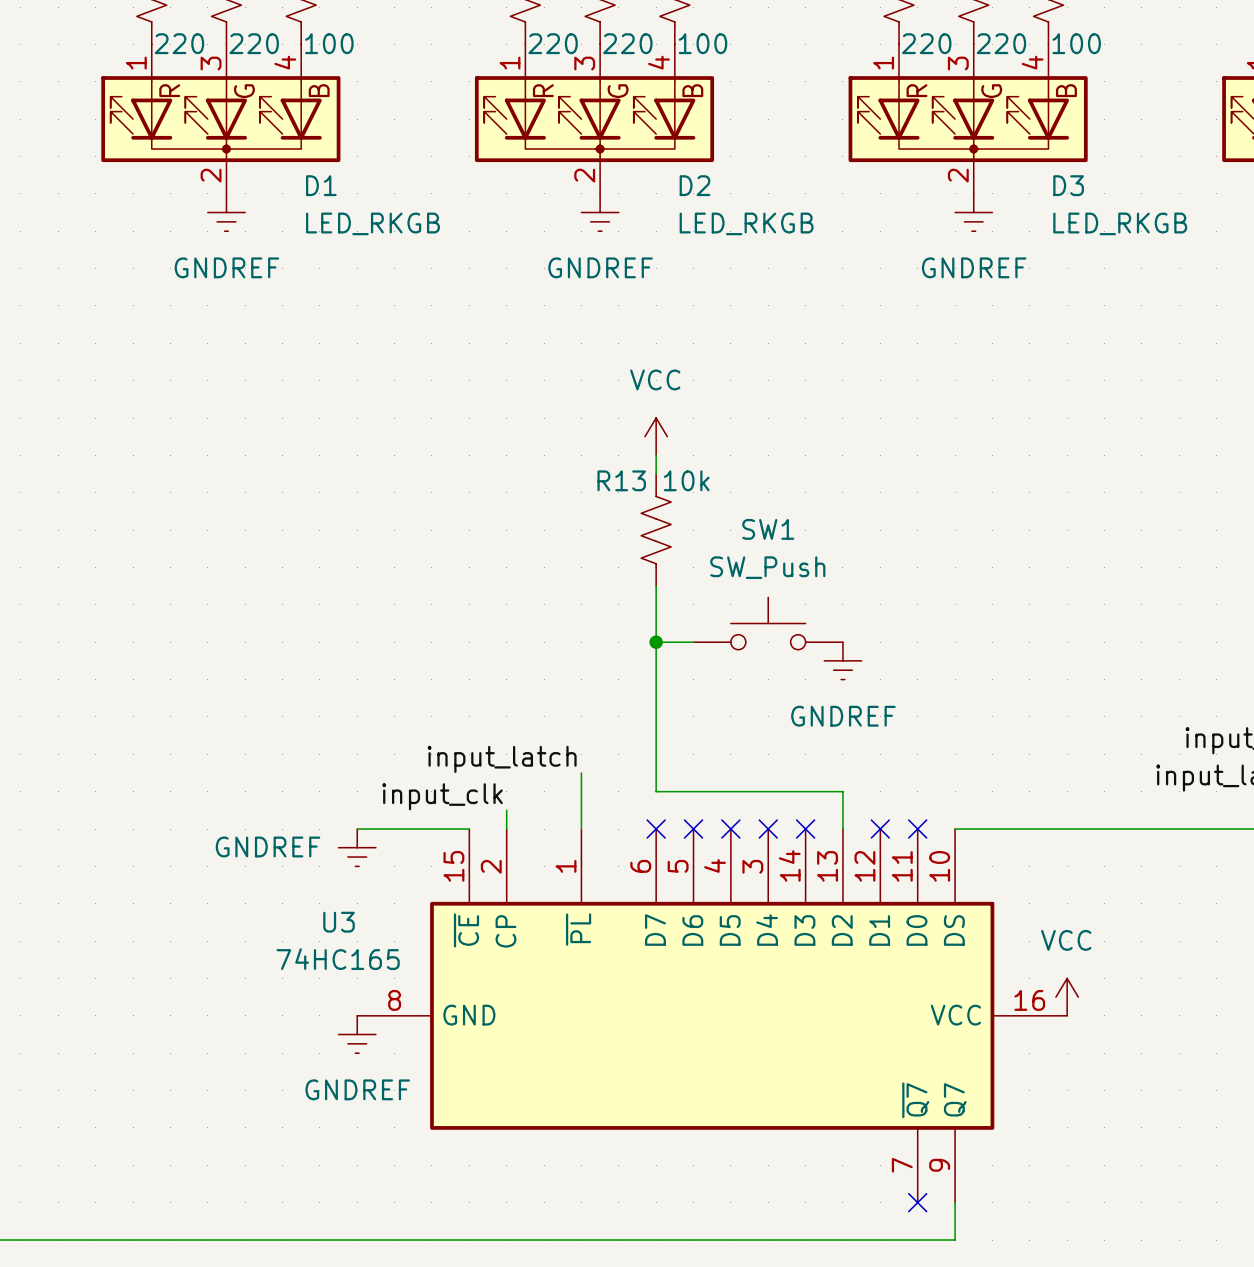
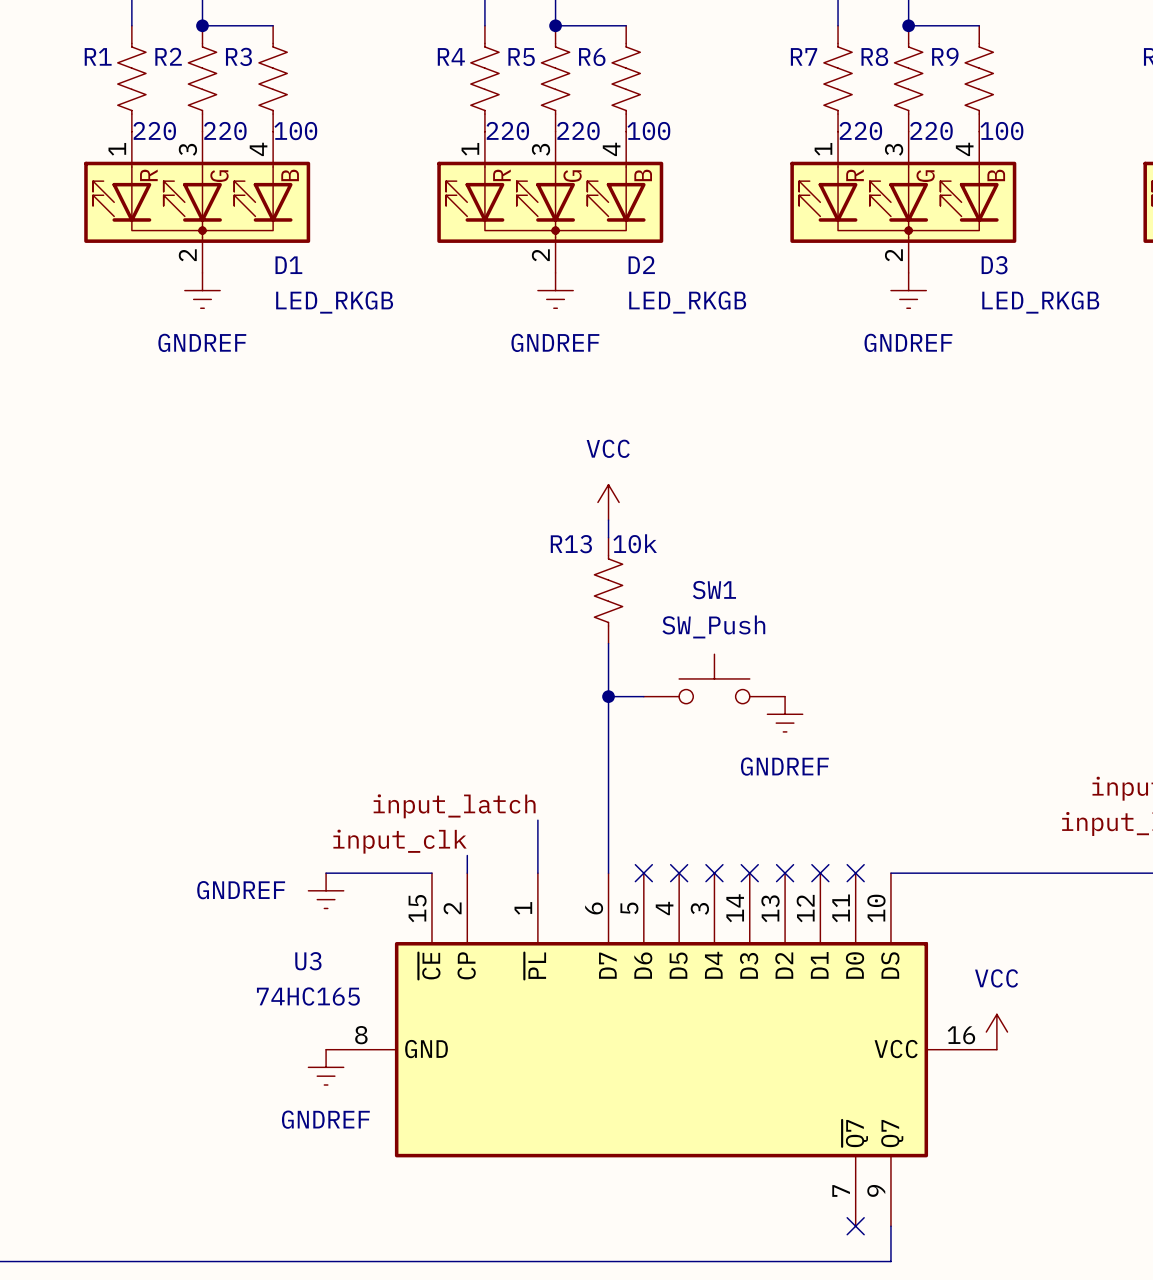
wire: (656, 791) (842, 791) (842, 829) -> (608, 837) (608, 873)
no-connect mark: (656, 829) -> none
no-connect mark: none -> (785, 873)

